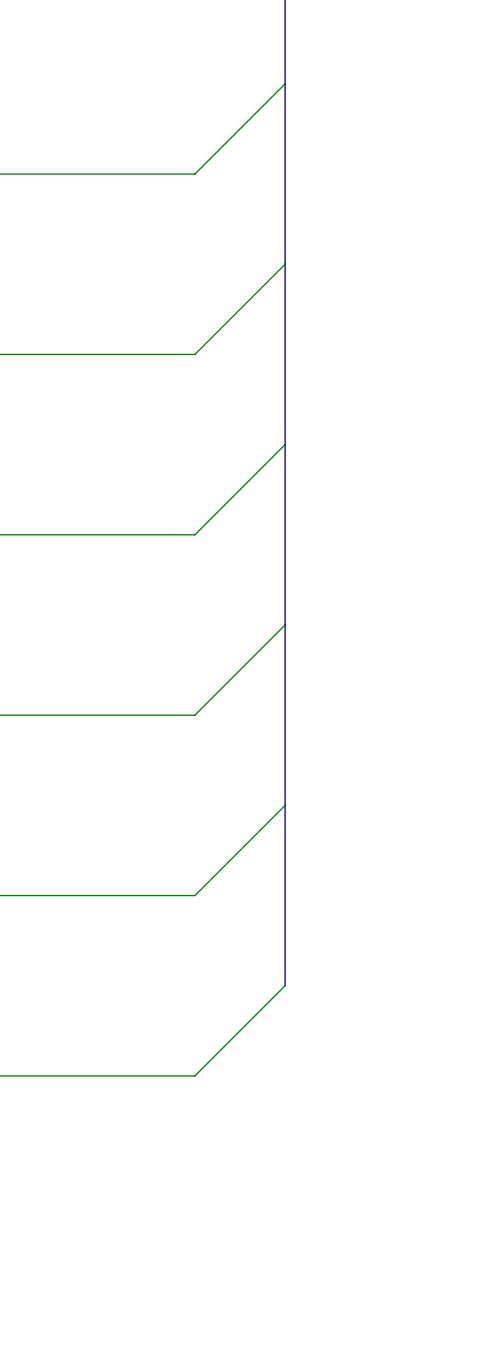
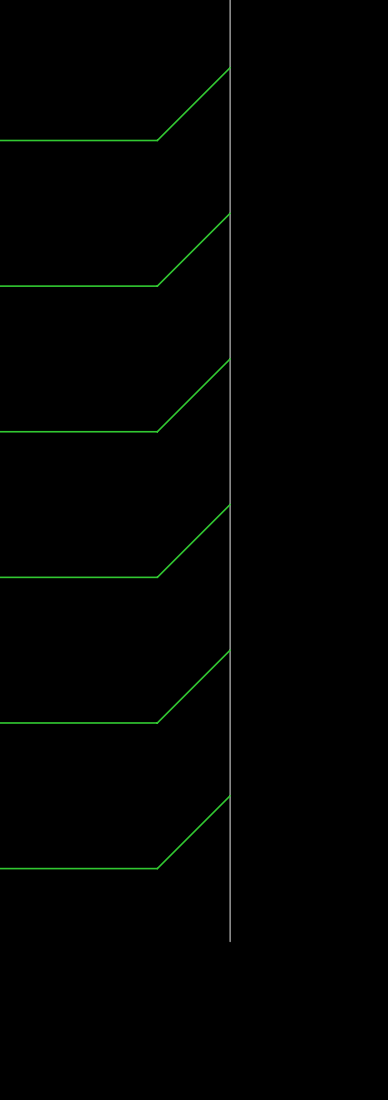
bus: none -> (230, 795) (230, 941)

